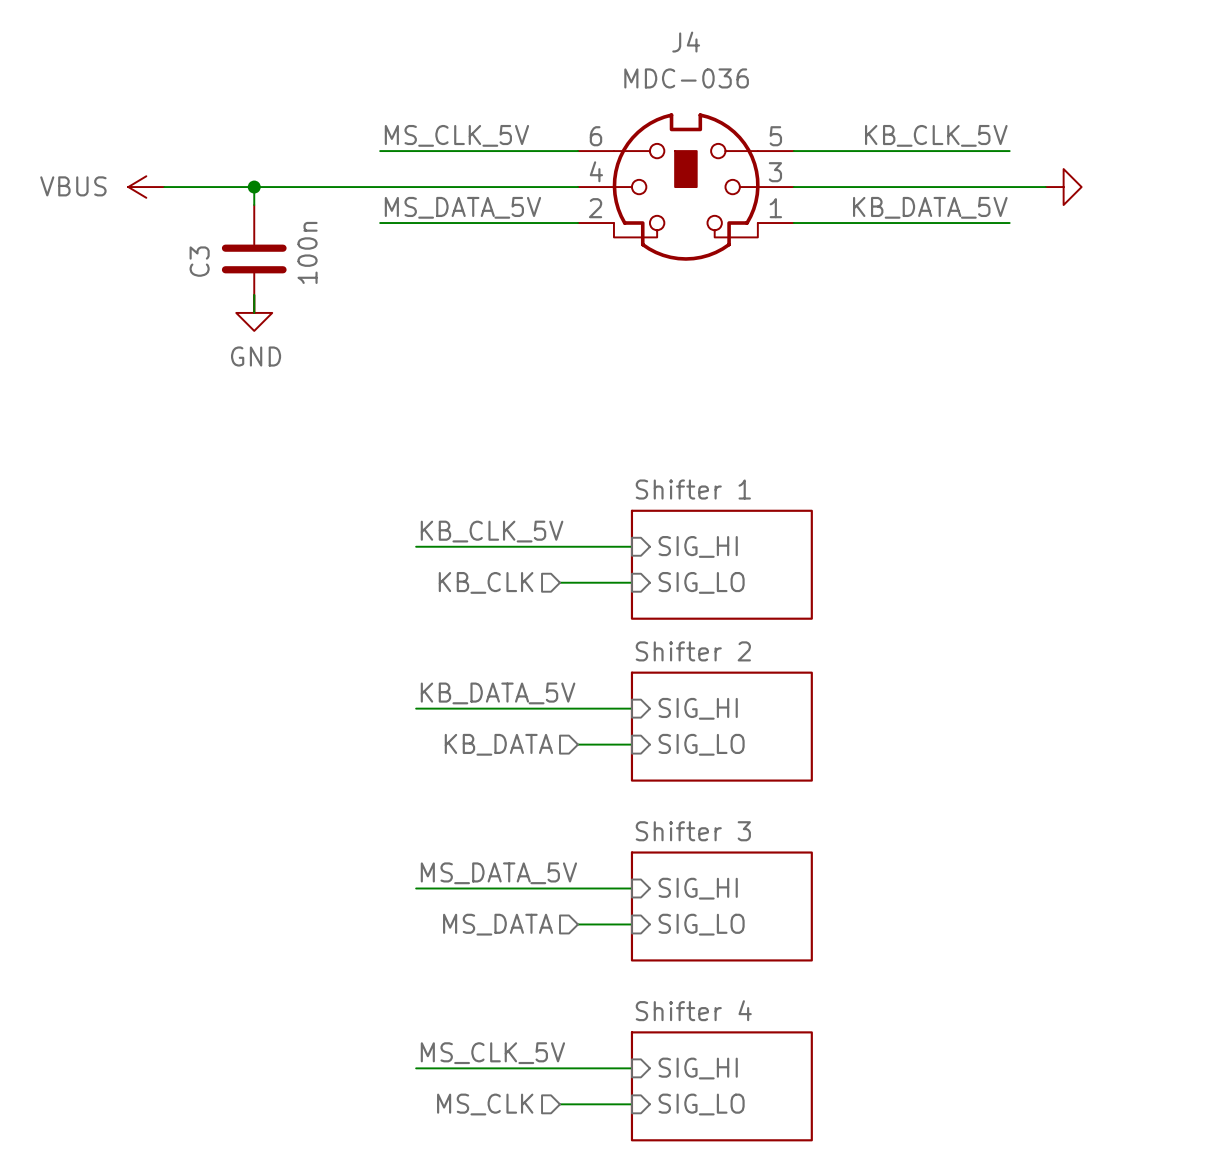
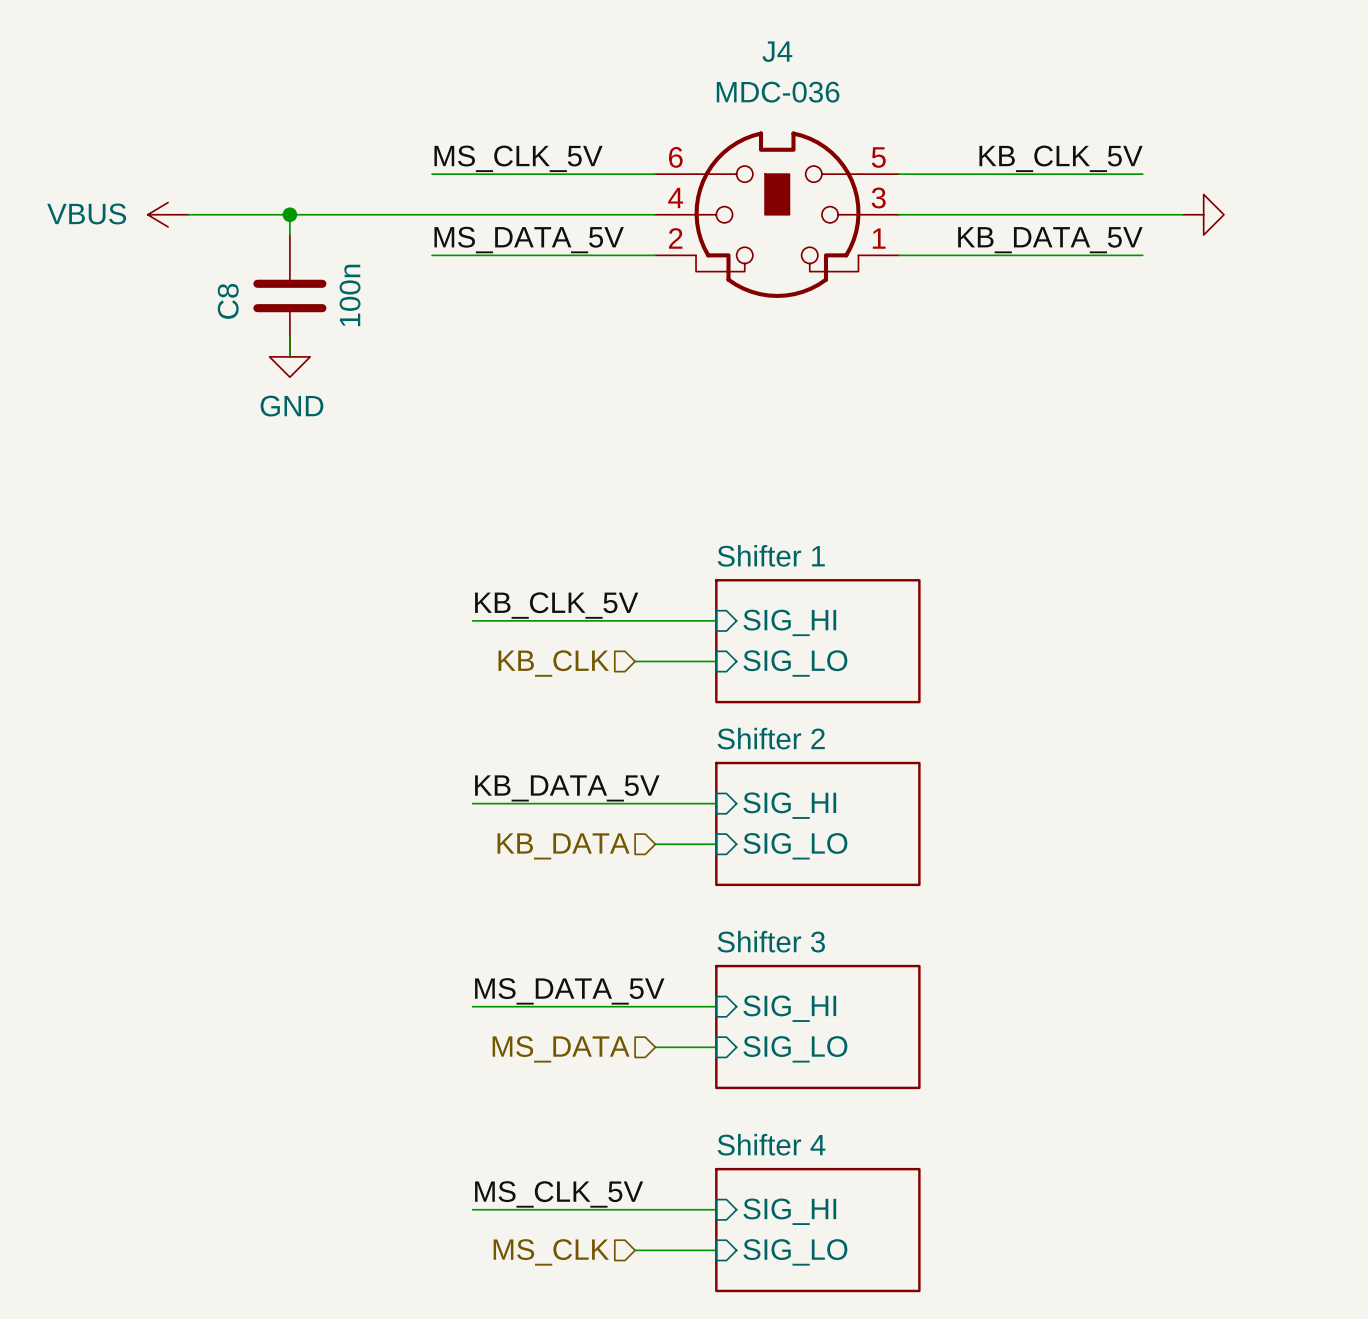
C3 name: C3 (199, 261) -> C8 (228, 301)

